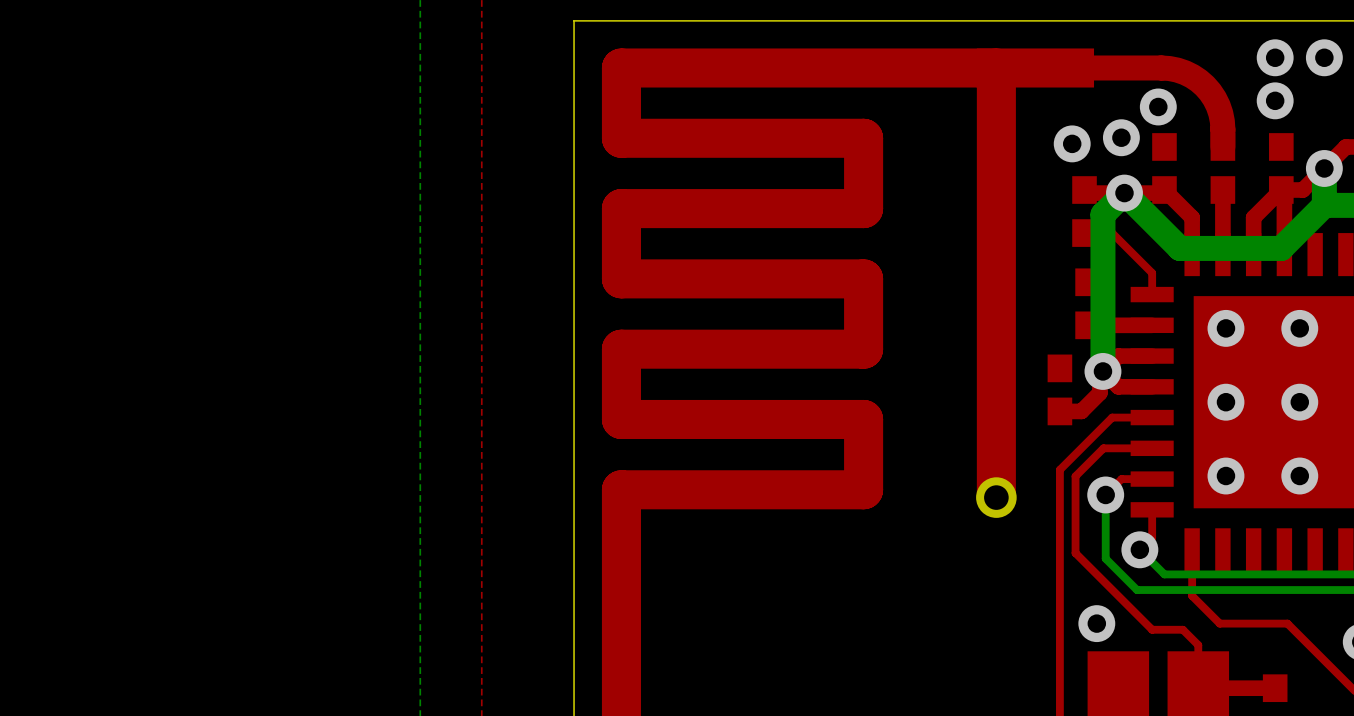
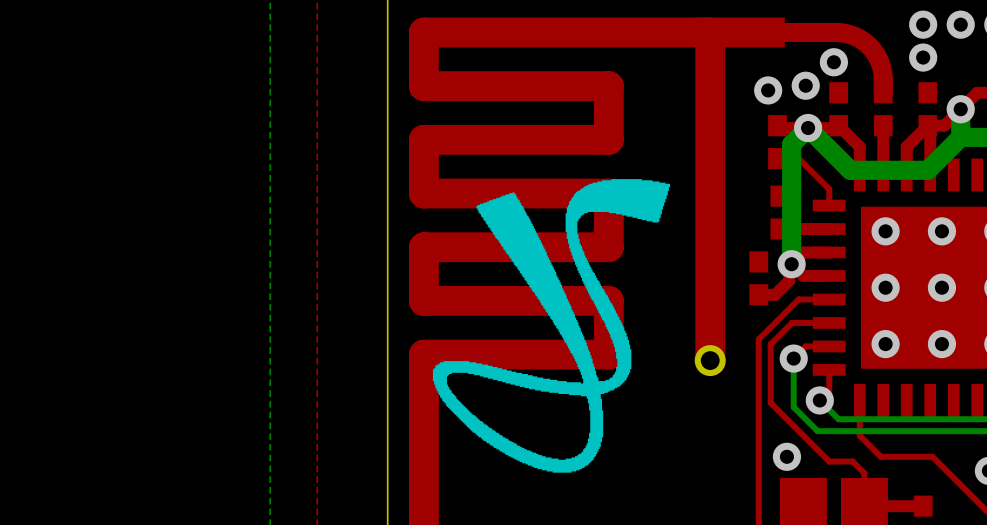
drawing: none -> [432, 179, 671, 473]

